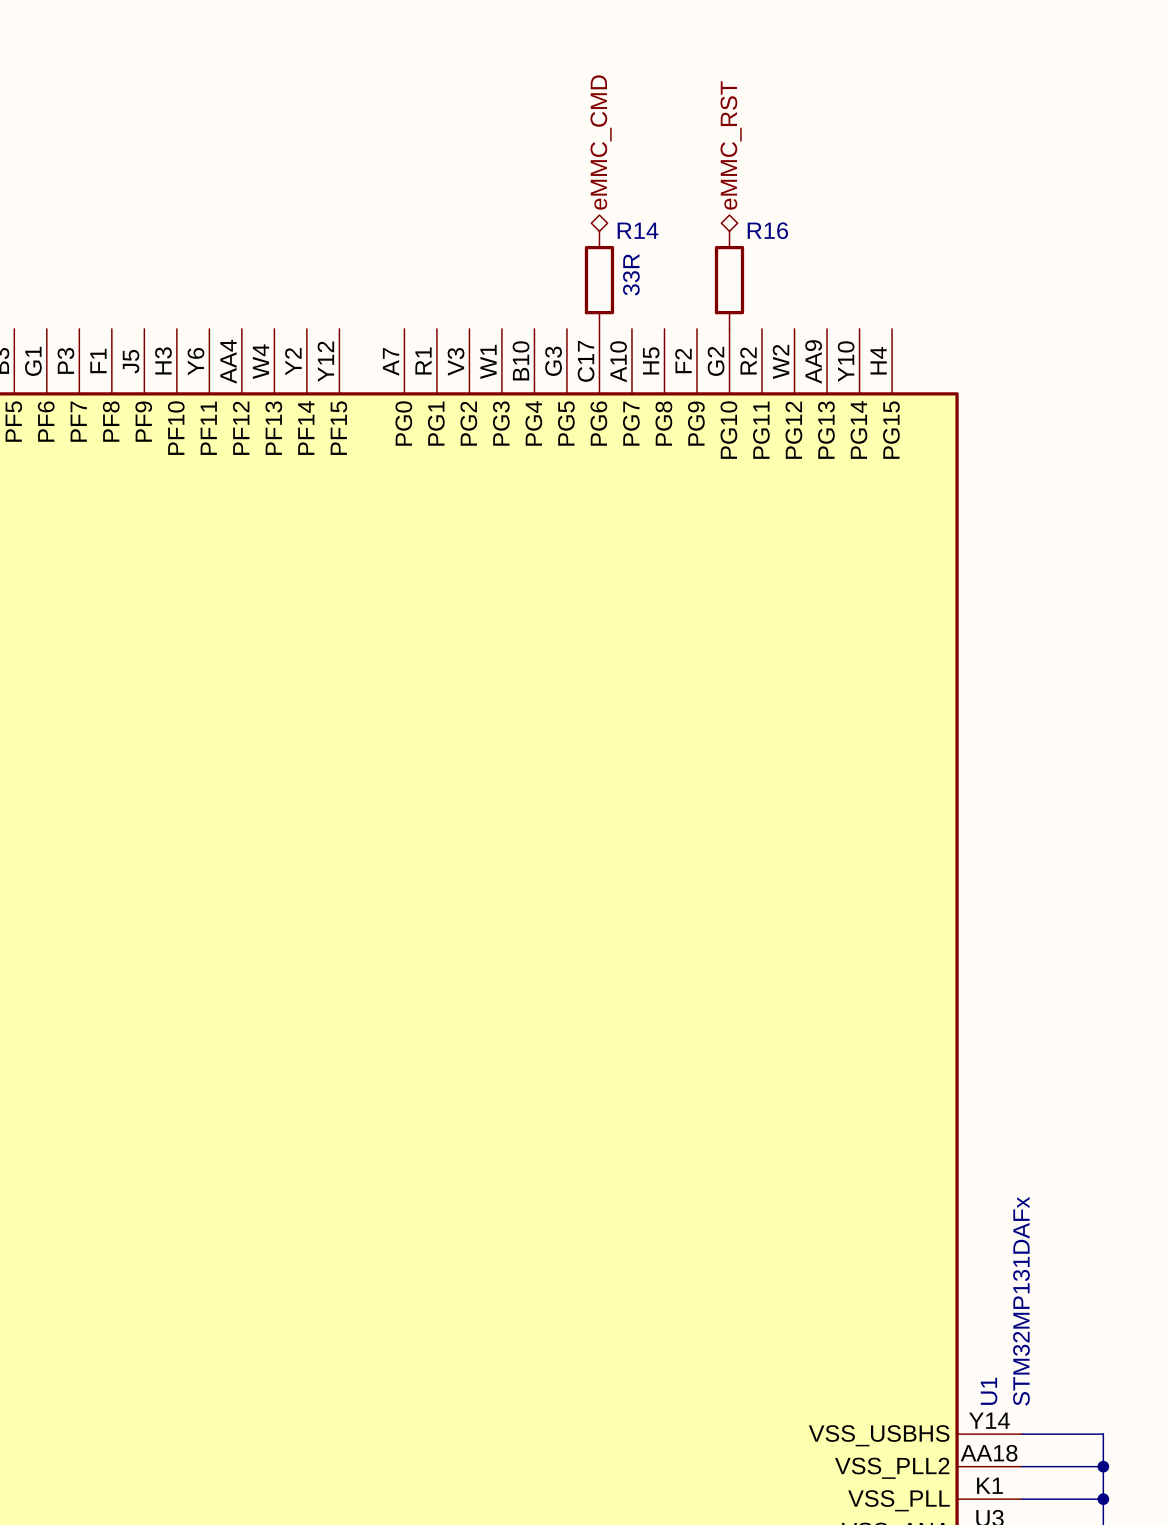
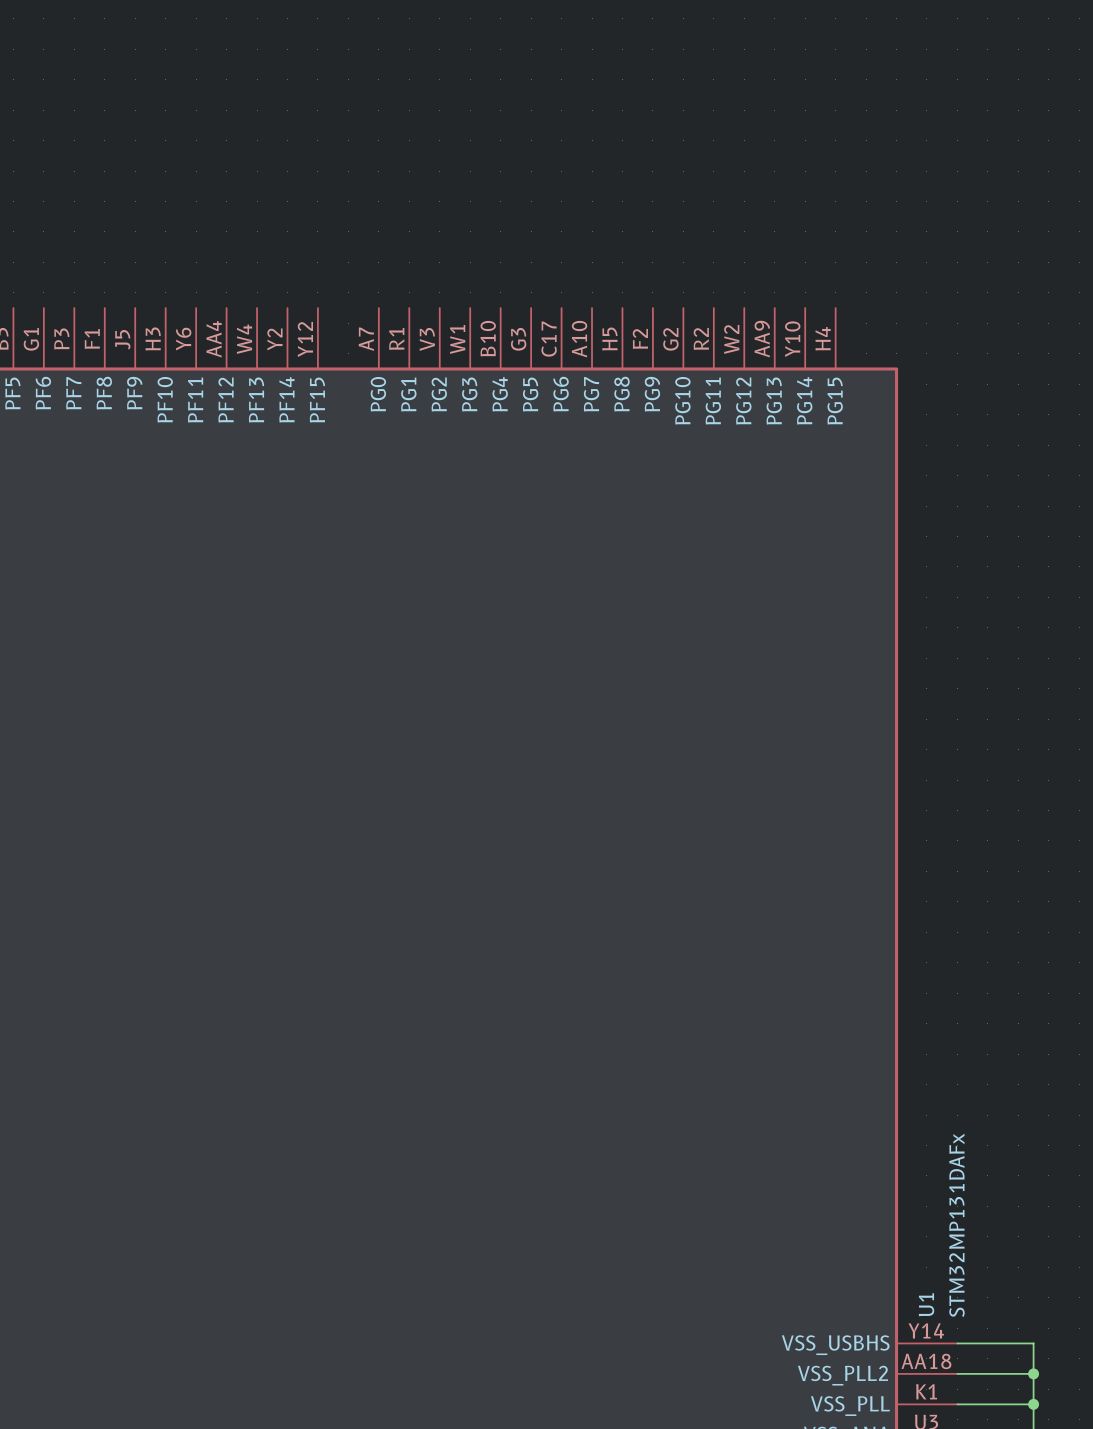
hierarchical label: eMMC_CMD (601, 142) -> none
hierarchical label: eMMC_RST (731, 145) -> none
R14: (599, 280) -> none
R16: 33R (729, 280) -> none

